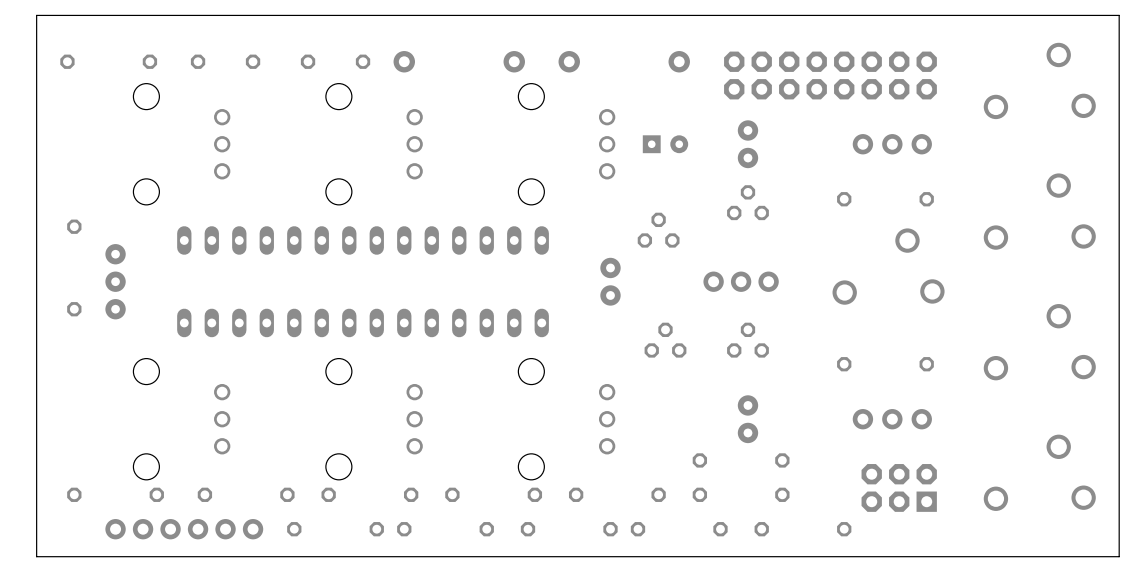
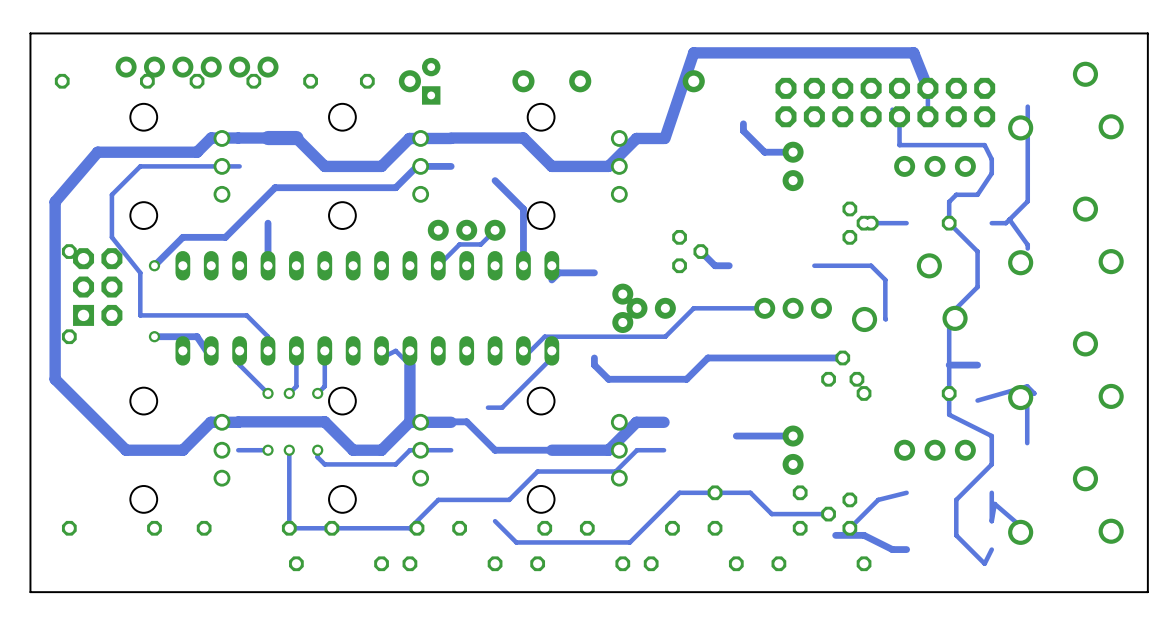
part: none -> (197, 67)
part position: (830, 75) -> (885, 102)
track: none -> (1027, 106) (1027, 201) (1005, 223) (991, 223)
track: none -> (892, 109) (899, 116) (899, 145) (984, 145) (991, 159) (991, 173) (977, 194) (956, 194) (949, 201) (949, 223) (977, 251) (977, 287) (949, 315) (949, 414) (991, 436) (991, 464) (956, 499) (956, 535) (984, 563) (991, 549)
track: none -> (927, 116) (927, 88) (913, 52) (693, 52) (664, 138) (636, 138) (608, 166) (551, 166) (523, 138) (409, 138) (381, 166) (324, 166) (296, 138) (211, 138) (197, 152) (97, 152) (55, 201) (55, 379) (126, 450) (182, 450) (210, 422) (238, 421) (324, 421) (353, 450) (381, 450) (409, 422)
track: none -> (743, 123) (743, 130) (764, 152) (793, 152)
track: none -> (239, 166) (140, 166) (111, 194) (111, 237) (140, 272) (140, 315) (246, 315) (268, 336) (268, 357)
track: none -> (451, 166) (417, 166) (395, 187) (275, 187) (225, 237) (182, 237) (154, 265)
part rotation: 0° (665, 144) -> 90° counterclockwise (431, 81)
part position: (665, 144) -> (431, 81)
part position: (747, 144) -> (793, 166)
part position: (892, 144) -> (935, 166)
track: none -> (495, 180) (523, 208) (523, 272)
track: none -> (1009, 219) (1027, 244) (1027, 248)
track: none -> (268, 223) (268, 272)
part: none -> (860, 223)
track: none -> (906, 223) (871, 223)
part: (747, 202) -> none
part: none -> (466, 230)
track: none -> (495, 230) (480, 244) (459, 244) (438, 265) (438, 272)
track: none -> (700, 251) (715, 265) (729, 265)
part rotation: 0° (658, 230) -> 90° clockwise (690, 251)
via: none -> (154, 265)
track: none -> (814, 265) (871, 265) (885, 279) (885, 319)
track: none -> (594, 272) (558, 272) (551, 279)
part: none -> (97, 287)
part: (115, 281) -> none
part: none -> (651, 308)
part position: (741, 281) -> (793, 308)
track: none -> (764, 308) (693, 308) (665, 336) (544, 336) (523, 357)
track: none -> (154, 336) (197, 336) (211, 357)
via: none -> (154, 336)
track: none -> (239, 357) (239, 365) (268, 393)
track: none -> (296, 357) (296, 386) (289, 393)
track: none -> (324, 357) (324, 386) (317, 393)
track: none -> (381, 357) (395, 350) (409, 365)
track: none -> (551, 357) (502, 407) (487, 407)
track: none -> (842, 357) (707, 357) (686, 379) (608, 379) (594, 365) (594, 357)
track: none -> (409, 365) (409, 422)
track: none -> (977, 365) (949, 365)
part: (665, 340) -> none
part: (747, 340) -> none
part: none -> (842, 368)
track: none -> (1027, 390) (1027, 443)
via: none -> (268, 393)
via: none -> (289, 393)
via: none -> (317, 393)
track: none -> (1027, 393) (1034, 393) (1027, 386) (977, 400)
track: none -> (664, 422) (636, 422) (608, 450) (495, 450) (466, 421) (409, 422)
track: none -> (793, 436) (736, 436)
track: none -> (268, 450) (238, 450)
via: none -> (268, 450)
via: none -> (289, 450)
via: none -> (317, 450)
track: none -> (451, 450) (409, 450) (395, 464) (324, 464) (317, 457) (317, 450)
track: none -> (664, 450) (636, 450) (615, 471) (537, 471) (509, 499) (438, 499) (409, 528) (289, 528) (289, 450)
part position: (747, 419) -> (793, 450)
part position: (892, 419) -> (935, 450)
track: none -> (906, 492) (878, 499) (849, 528)
track: none -> (991, 492) (991, 521) (994, 503) (1027, 532)
track: none -> (828, 514) (771, 514) (750, 492) (679, 492) (629, 542) (516, 542) (495, 521)
part: none -> (839, 514)
part: (899, 487) -> none
track: none -> (835, 535) (864, 535) (892, 549) (906, 549)
part: (184, 529) -> none

